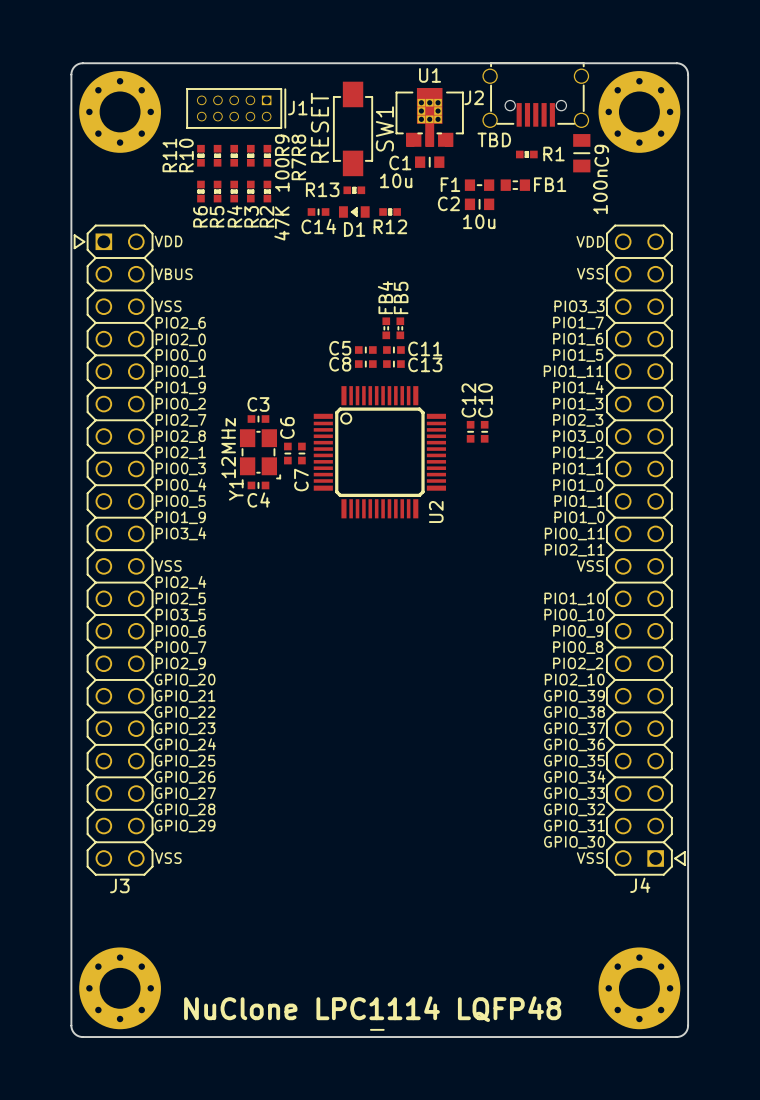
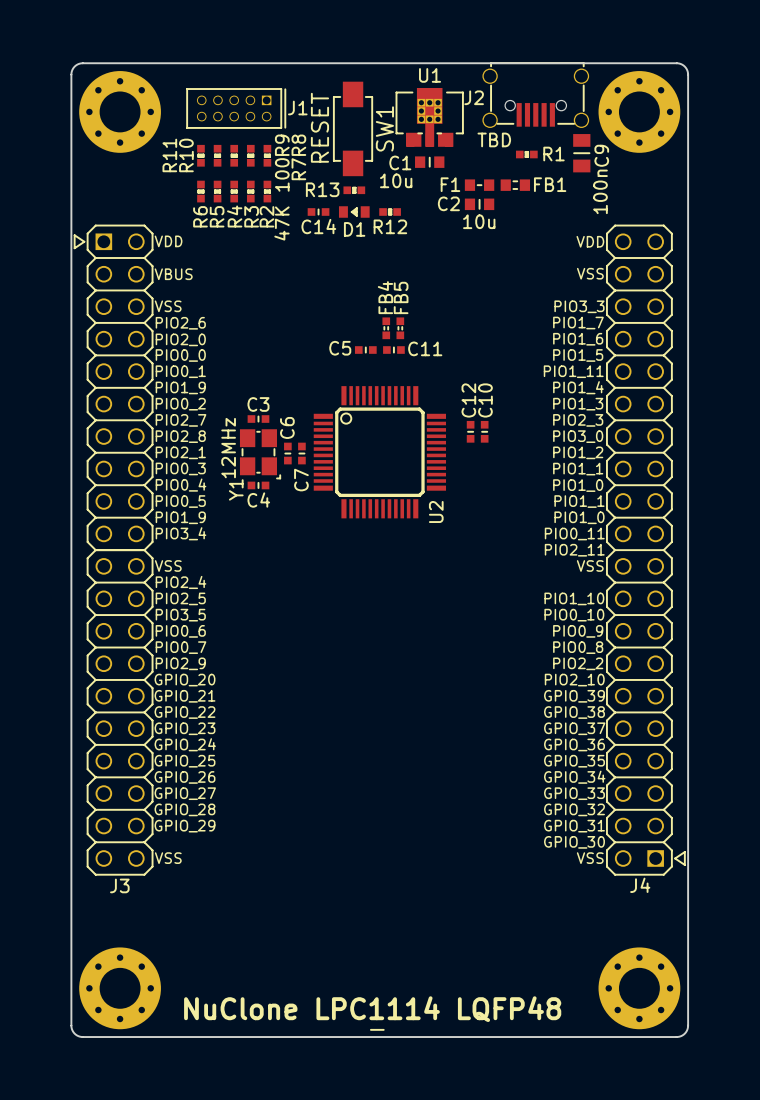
C8: (365, 364) -> none
C13: (393, 364) -> none

